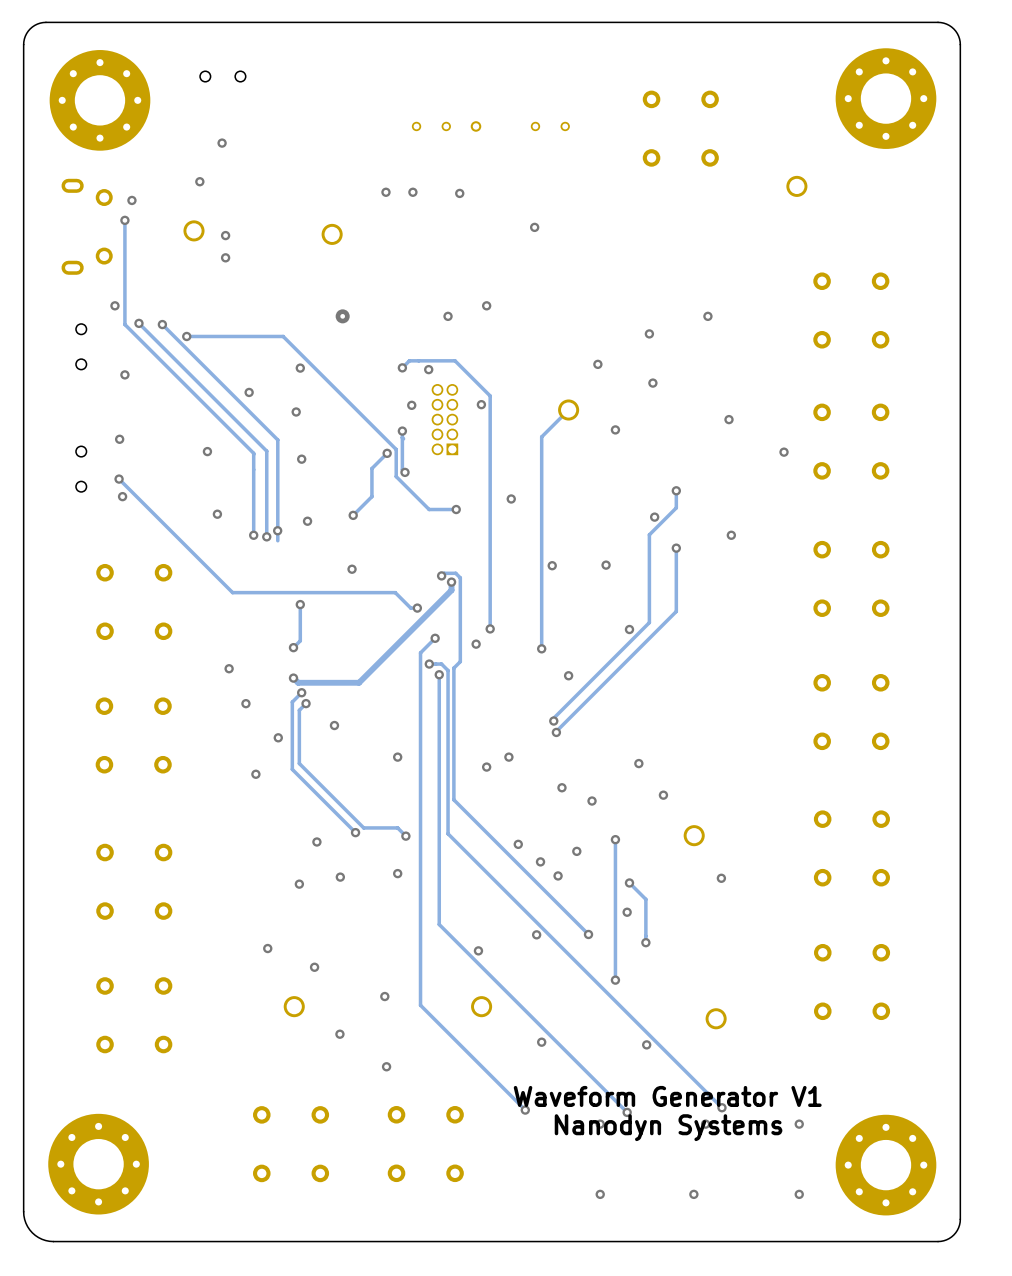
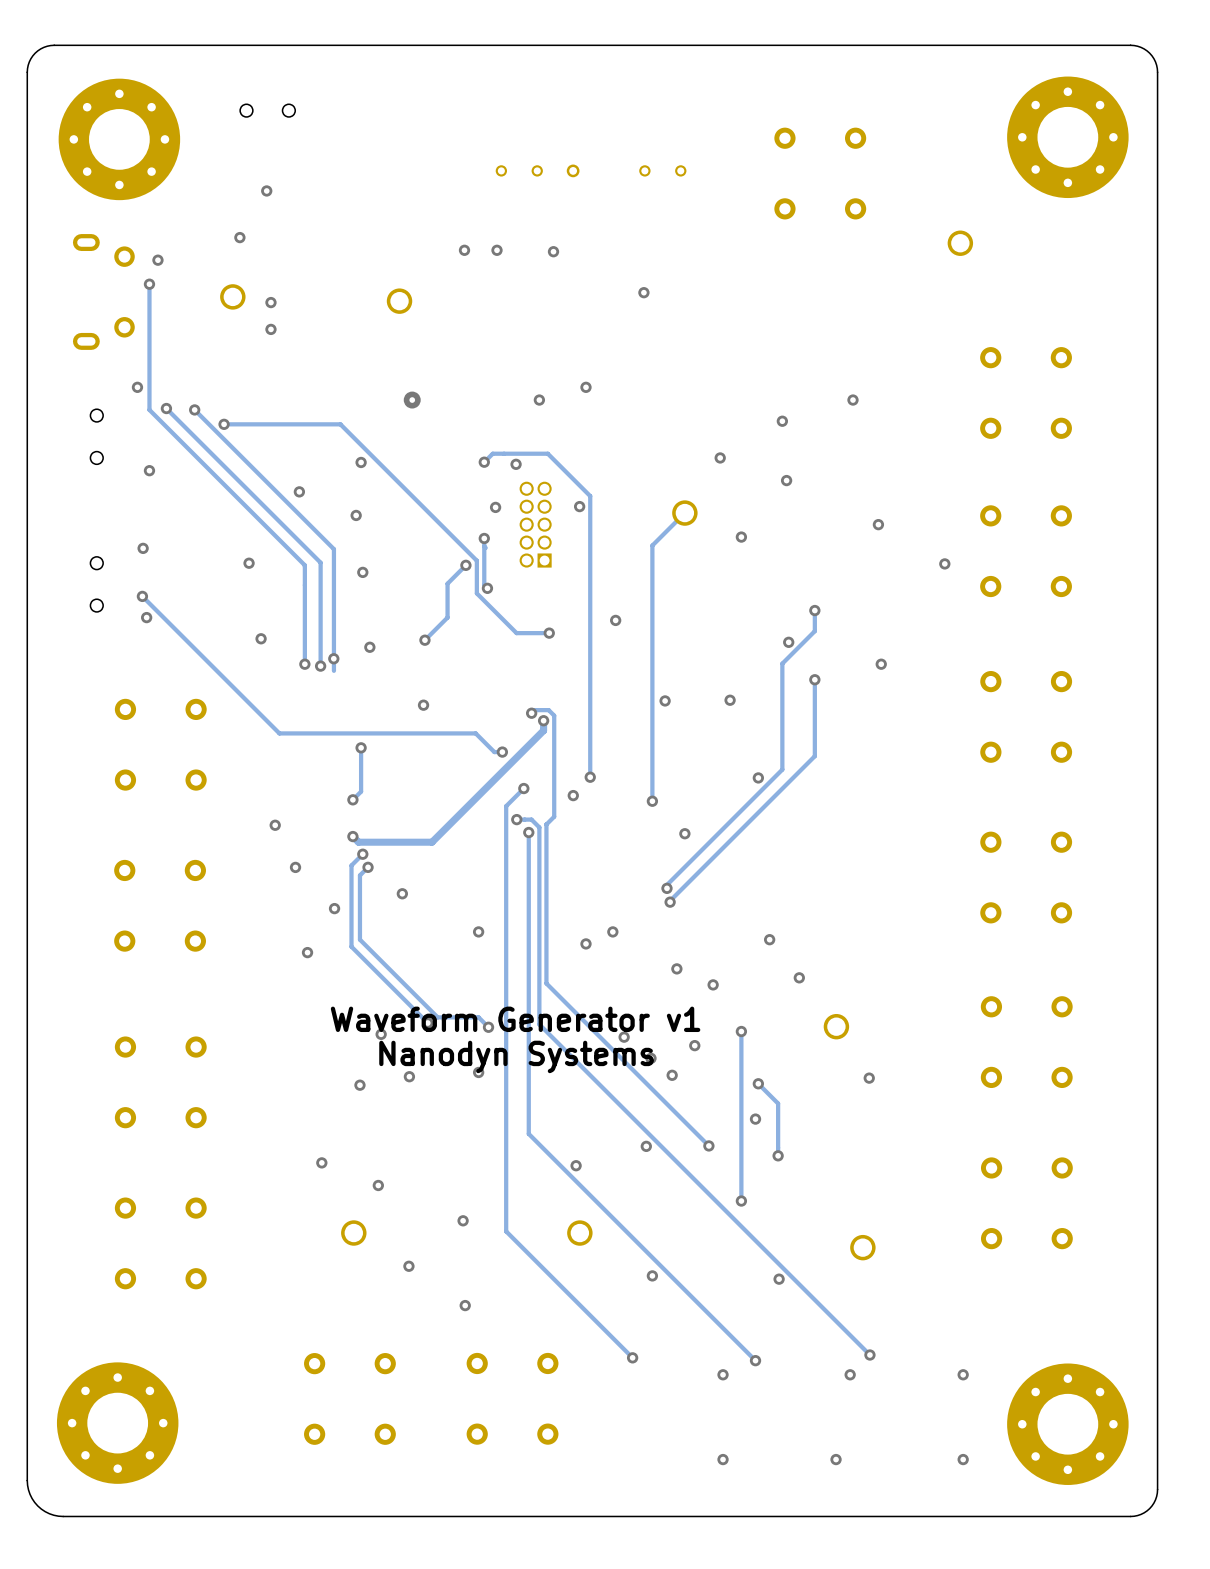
text: none -> Waveform Generator v1 (515, 1019)
text: none -> Nanodyn Systems (516, 1056)
text: Waveform Generator V1 (667, 1096) -> none
text: Nanodyn Systems (668, 1127) -> none

